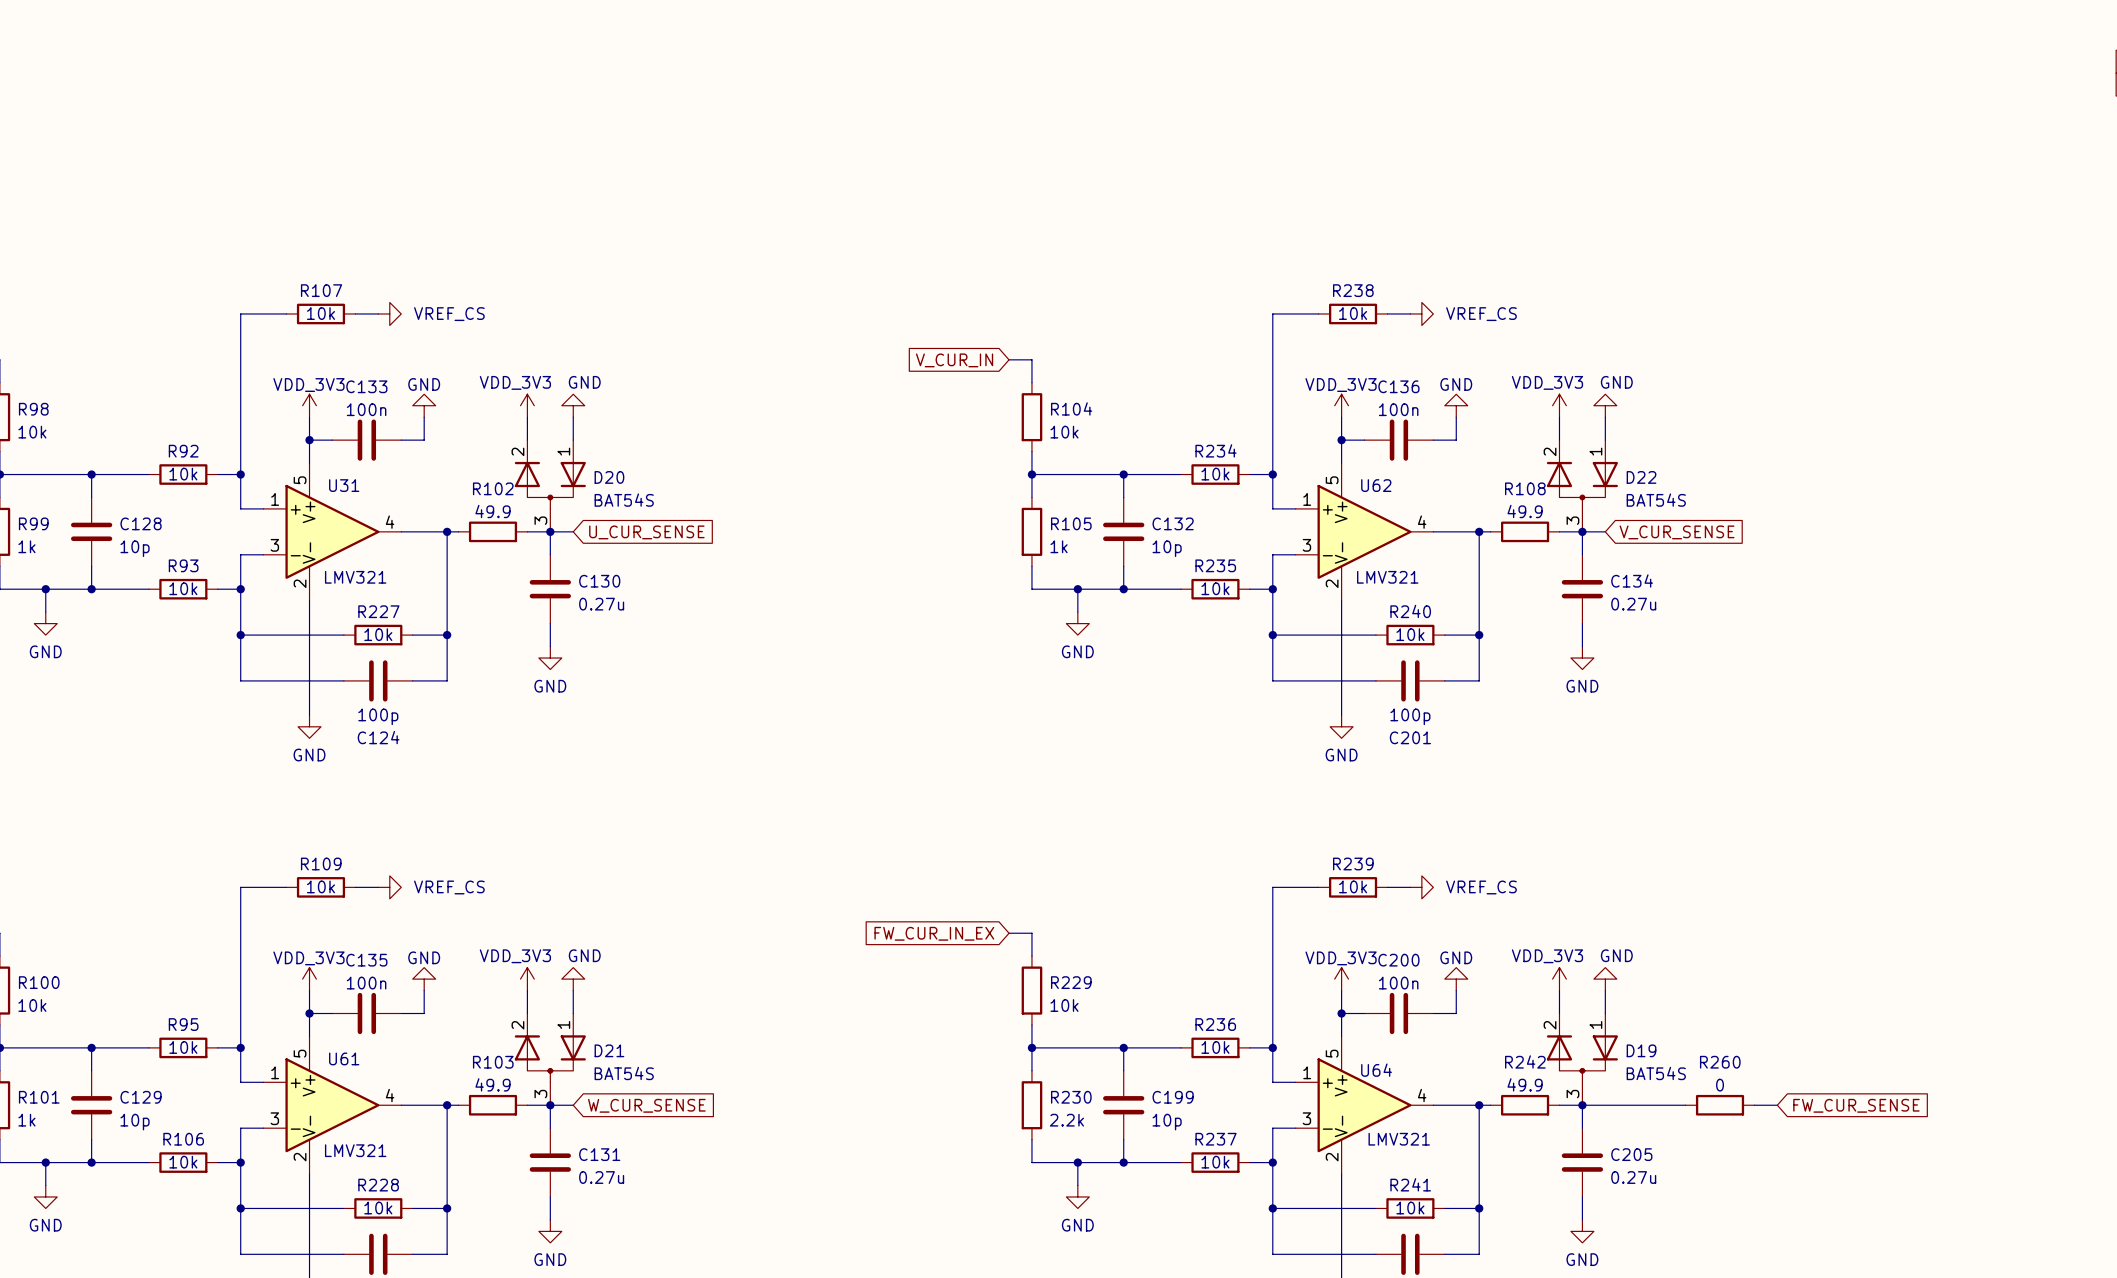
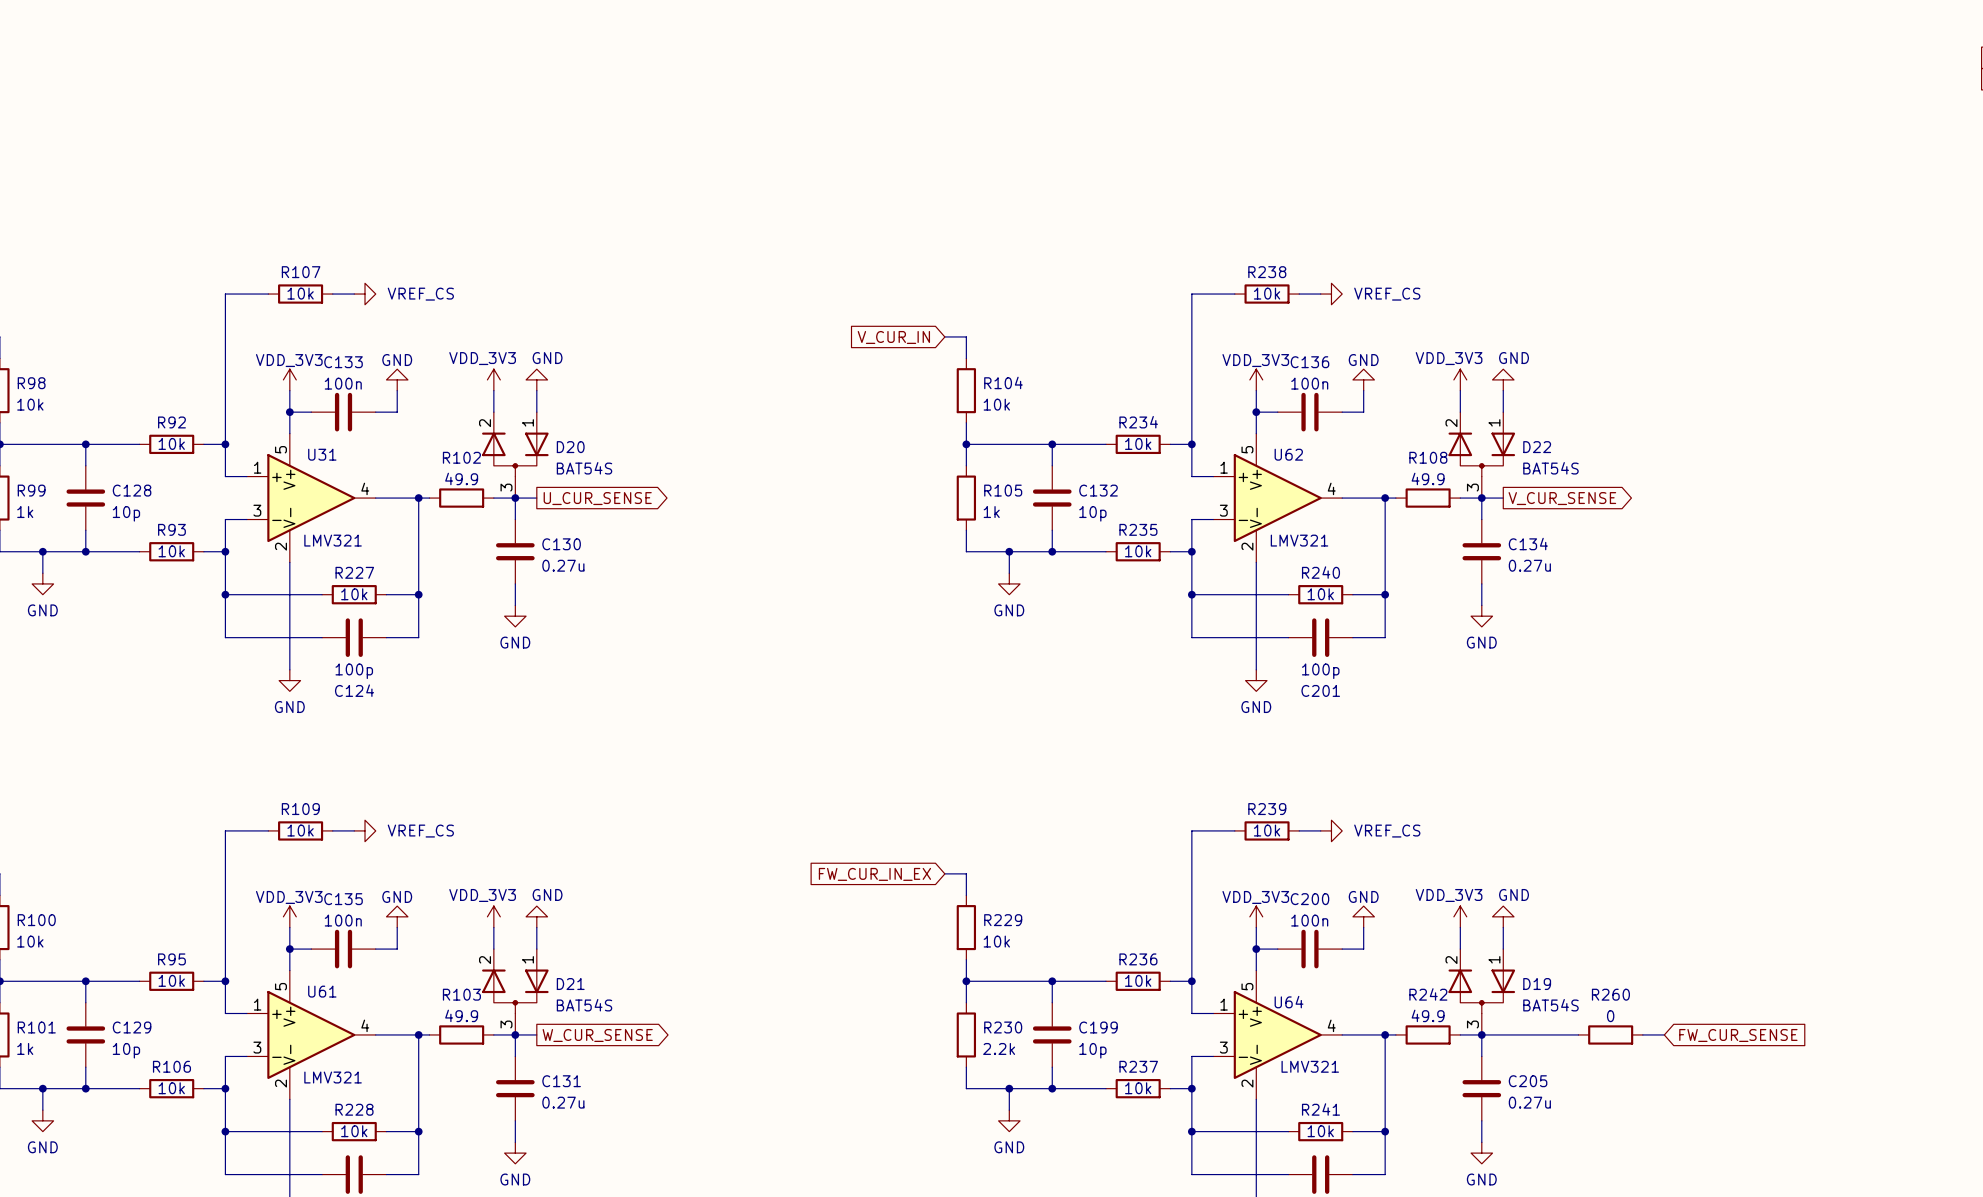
global label shape: input (646, 532) -> output (597, 498)
global label shape: input (1677, 532) -> output (1562, 498)
global label shape: input (646, 1105) -> output (597, 1035)

